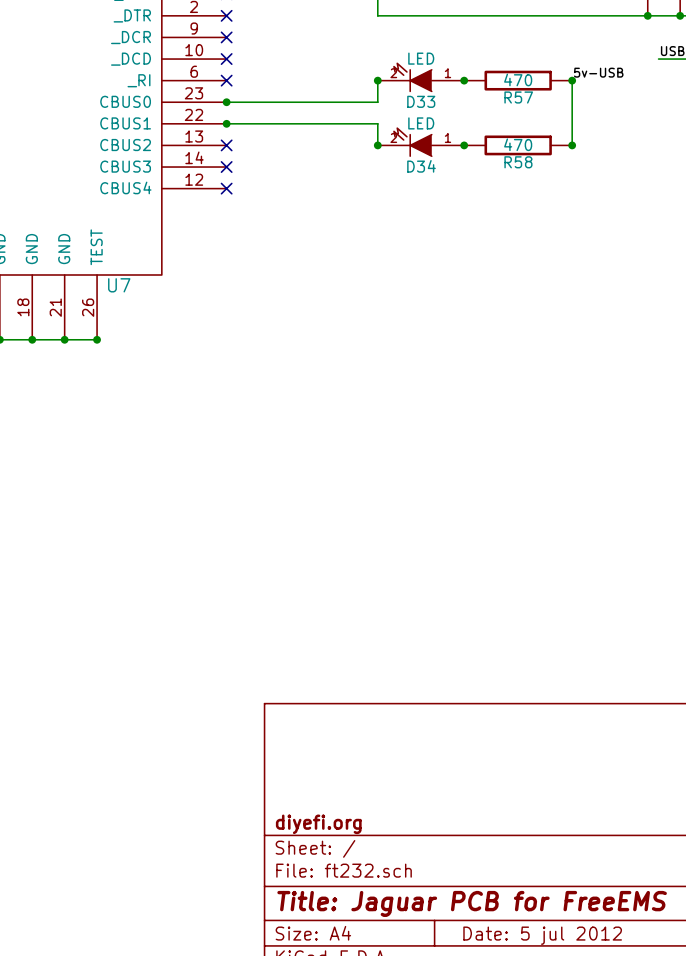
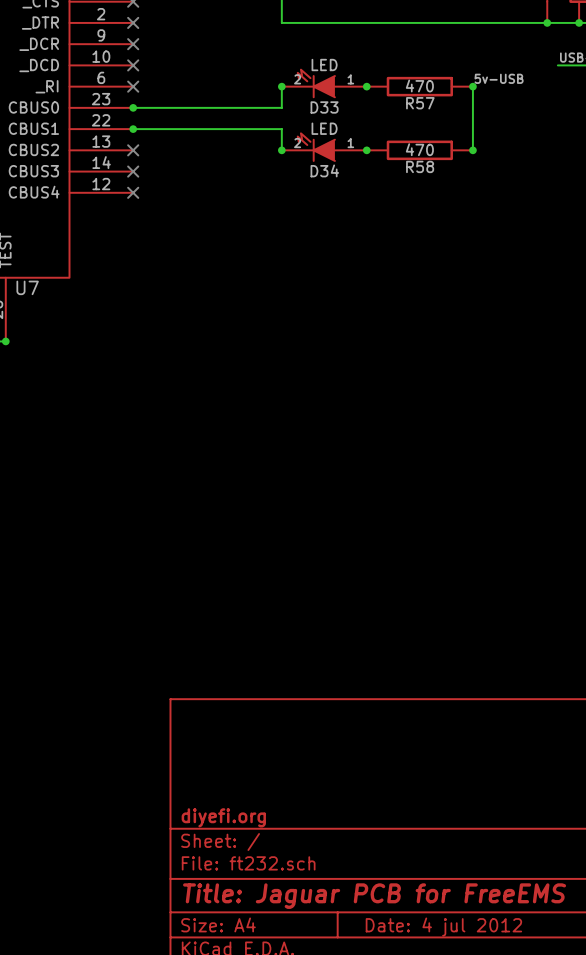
title block: Date: 5 jul 2012 (542, 935) -> Date: 4 jul 2012 (443, 927)

